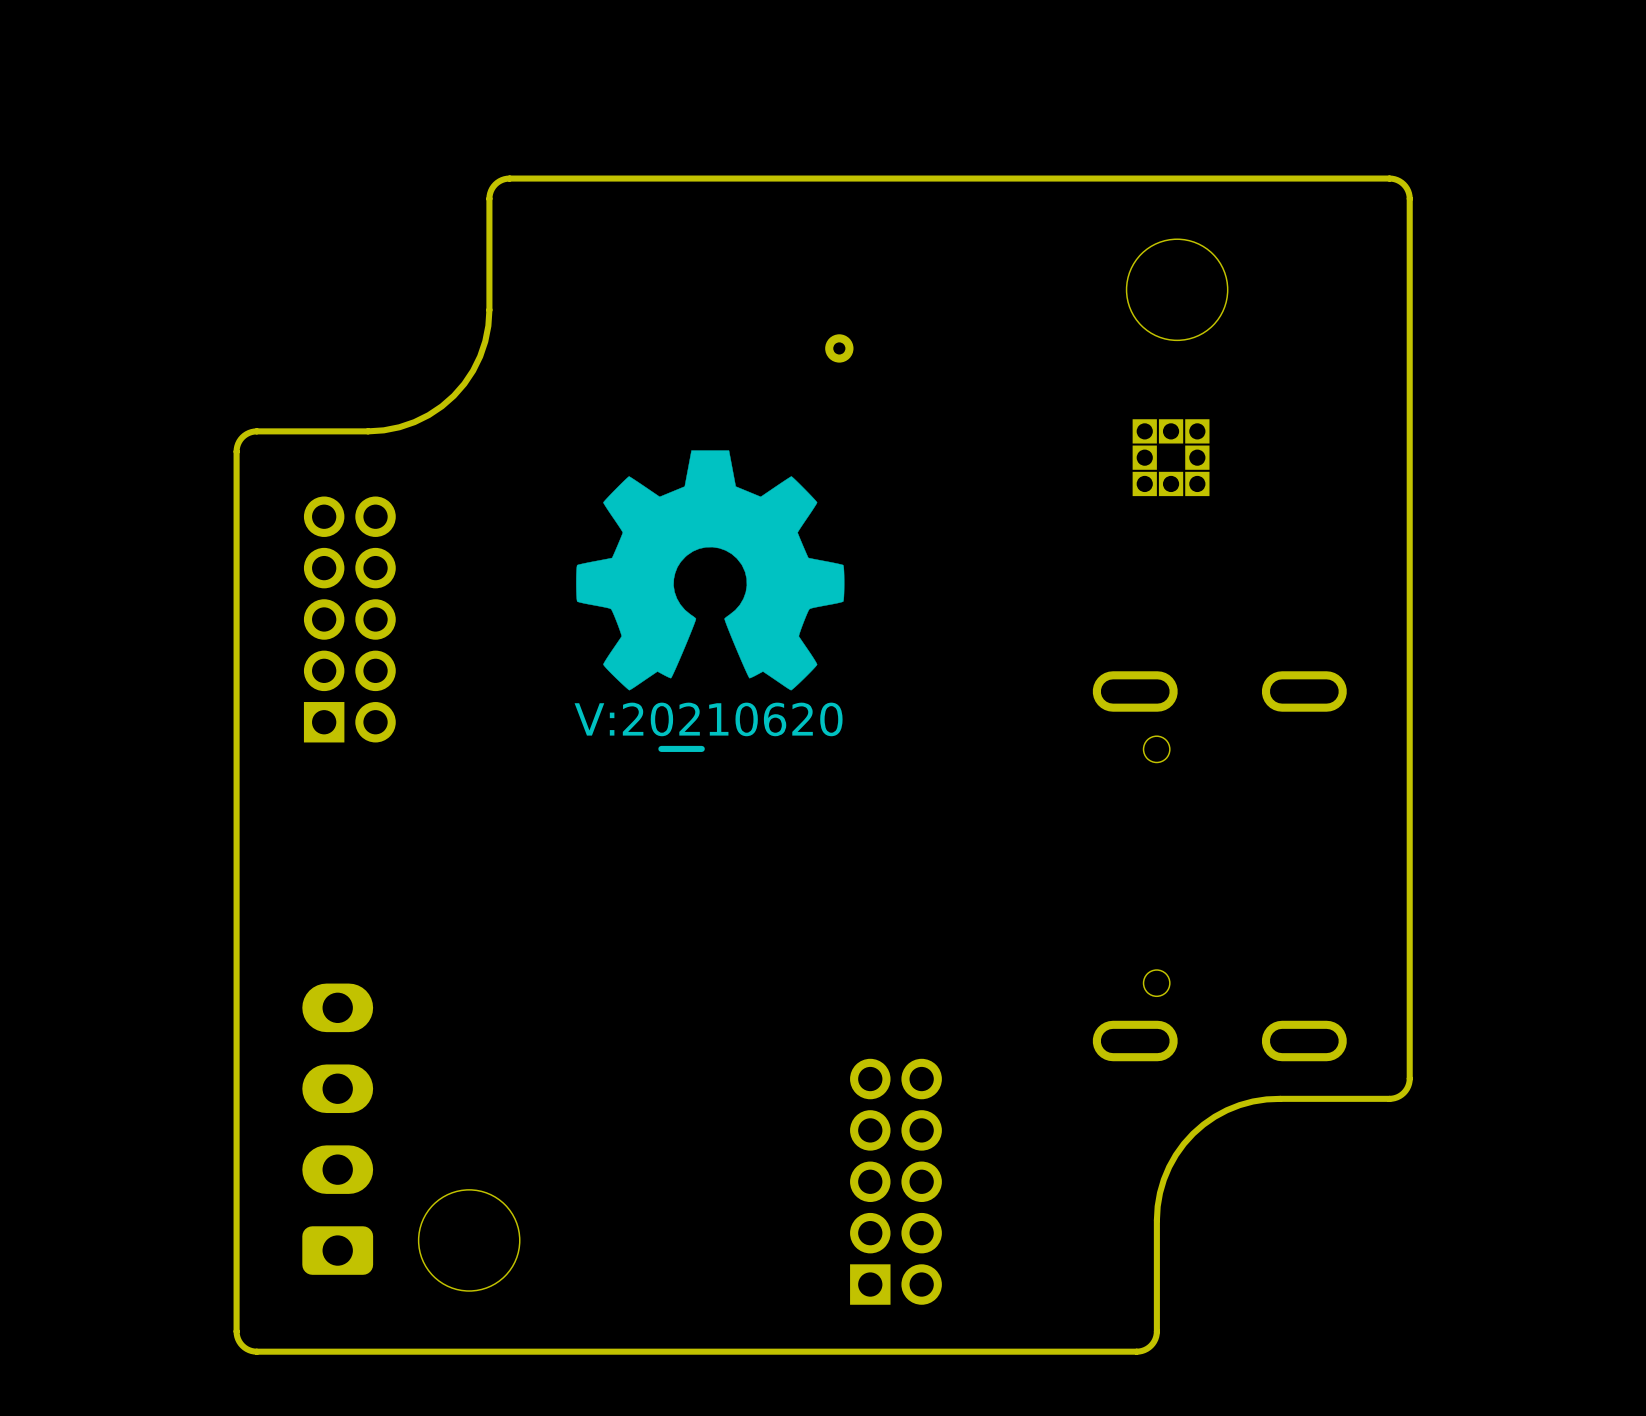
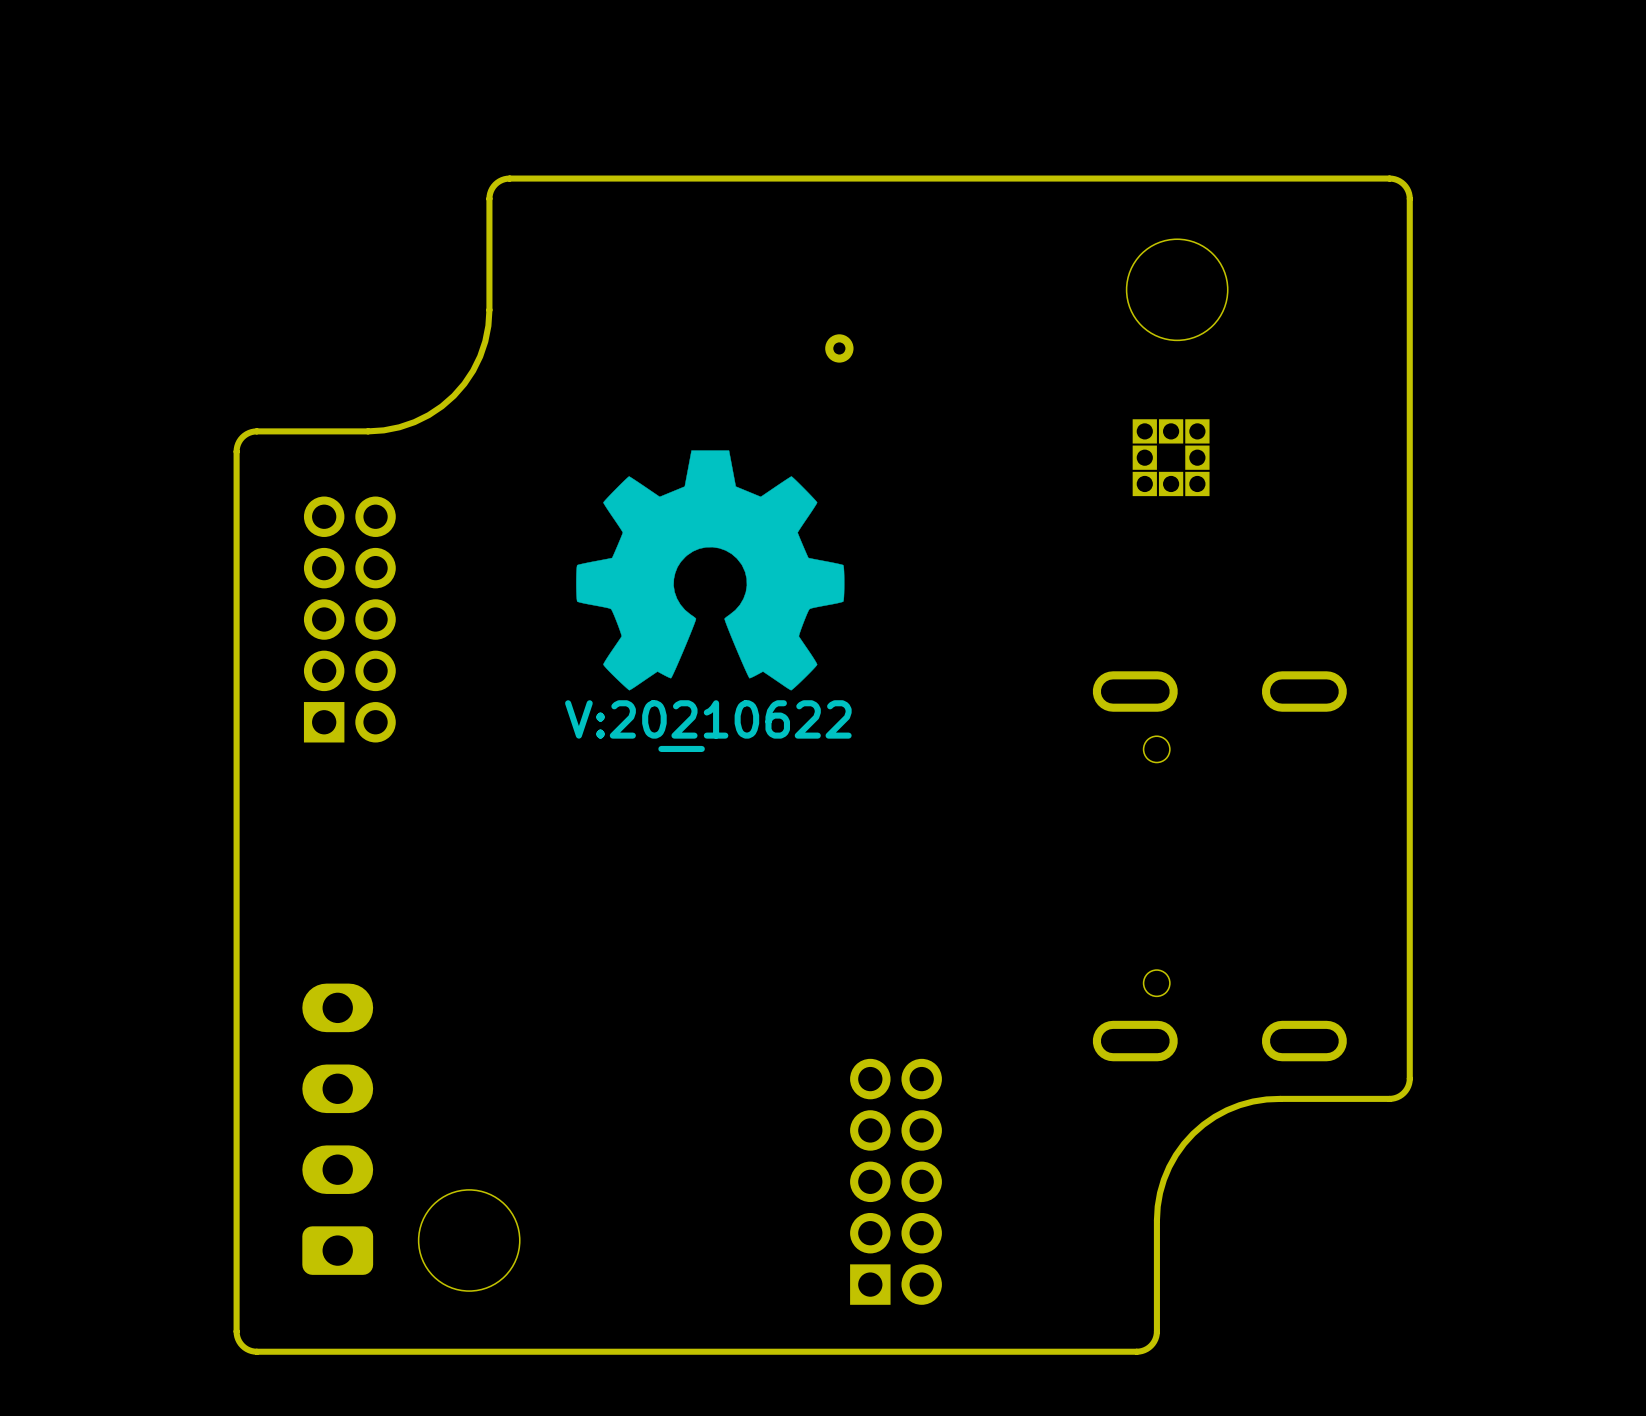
drawing shape: [574, 702, 843, 752] -> [565, 700, 852, 752]

